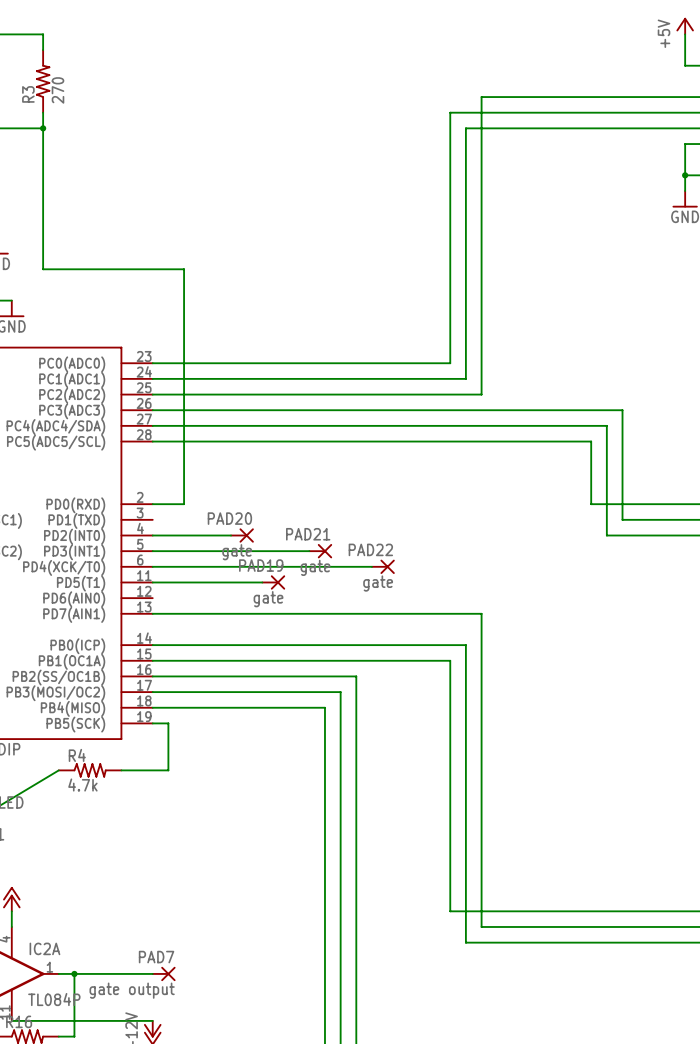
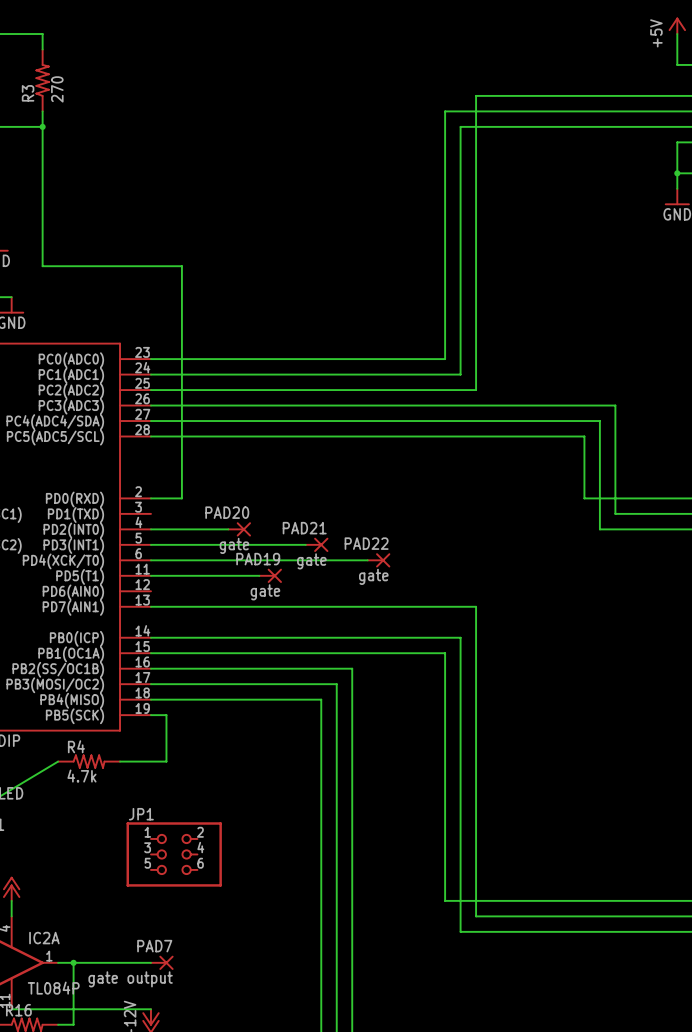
JP1: none -> (174, 854)

